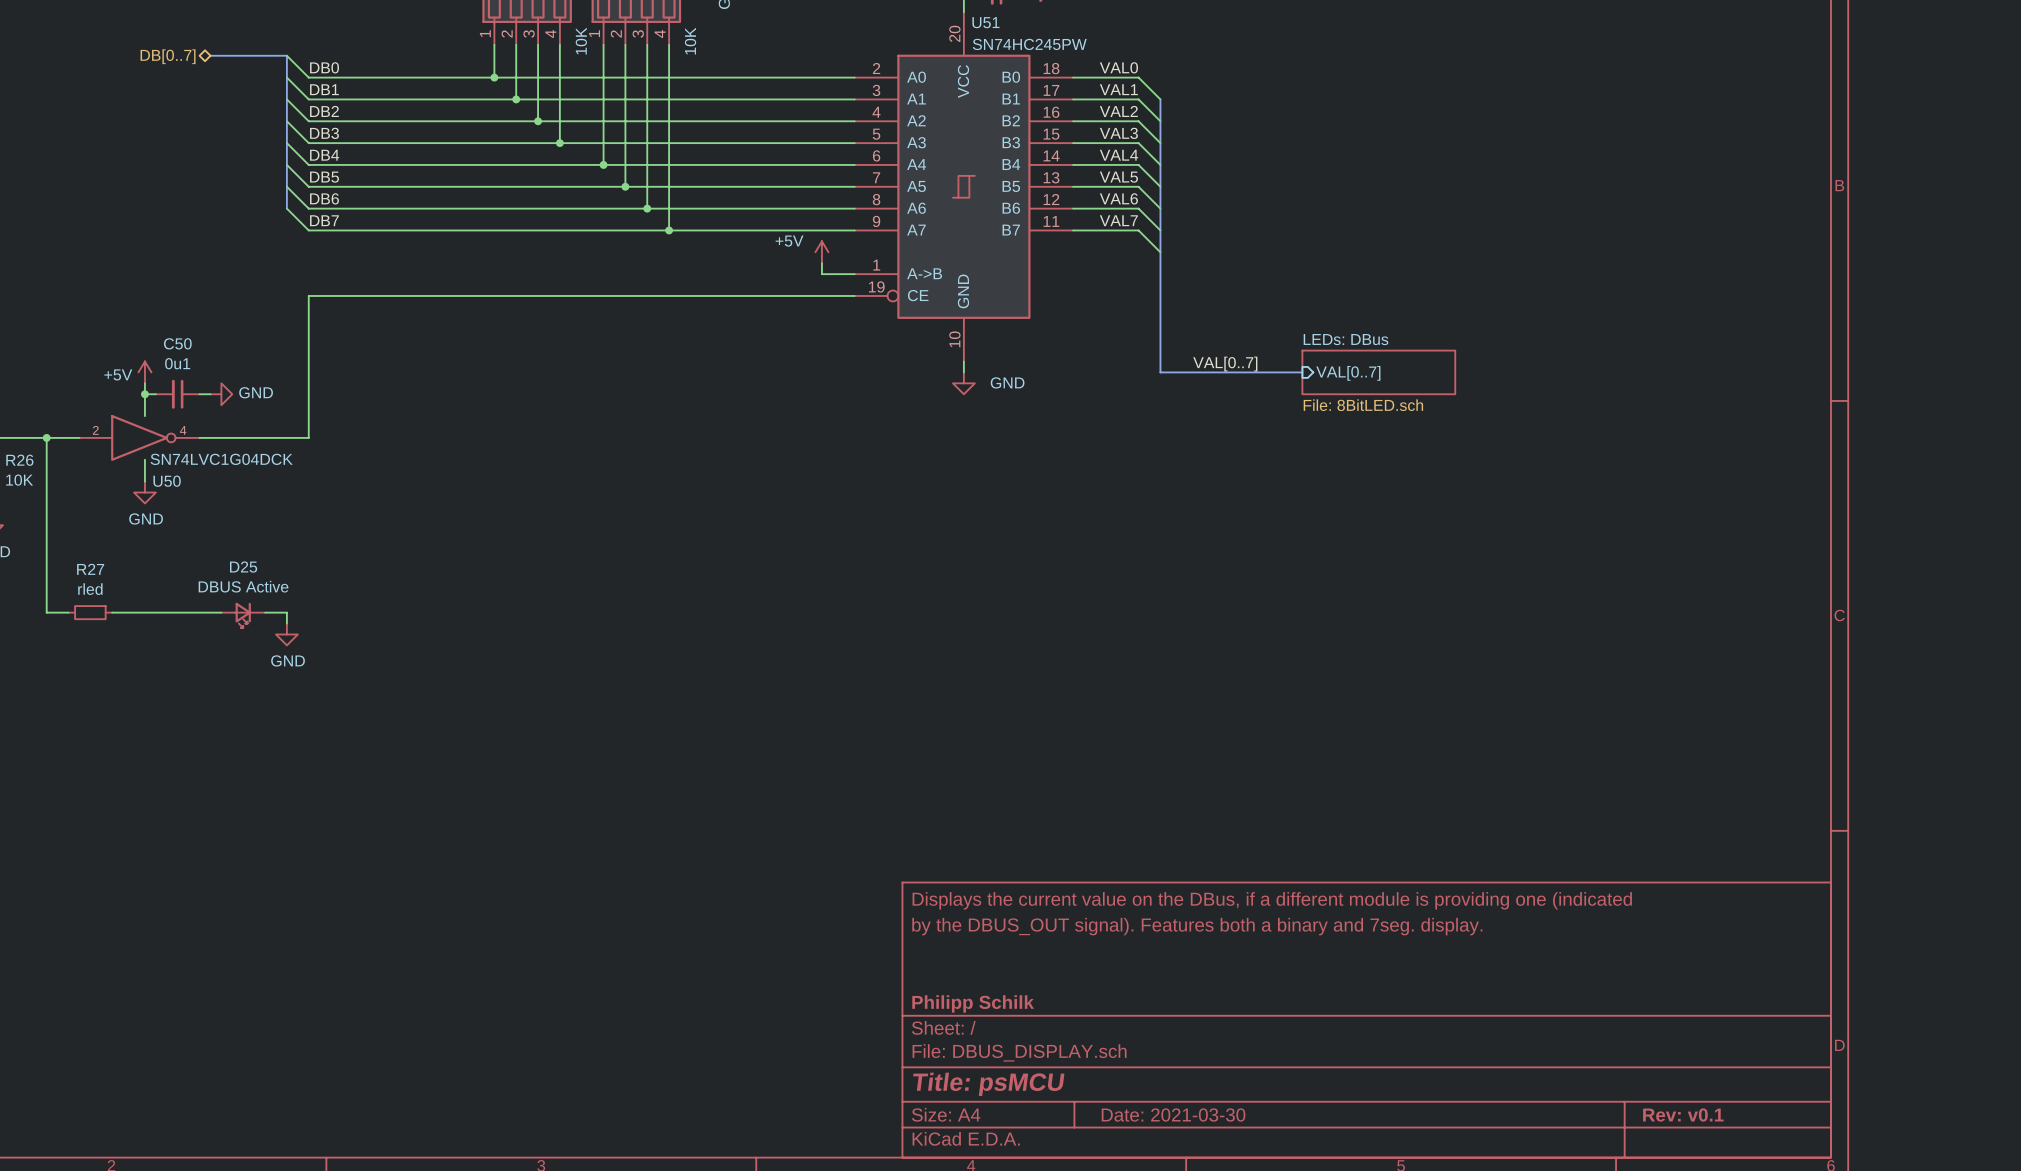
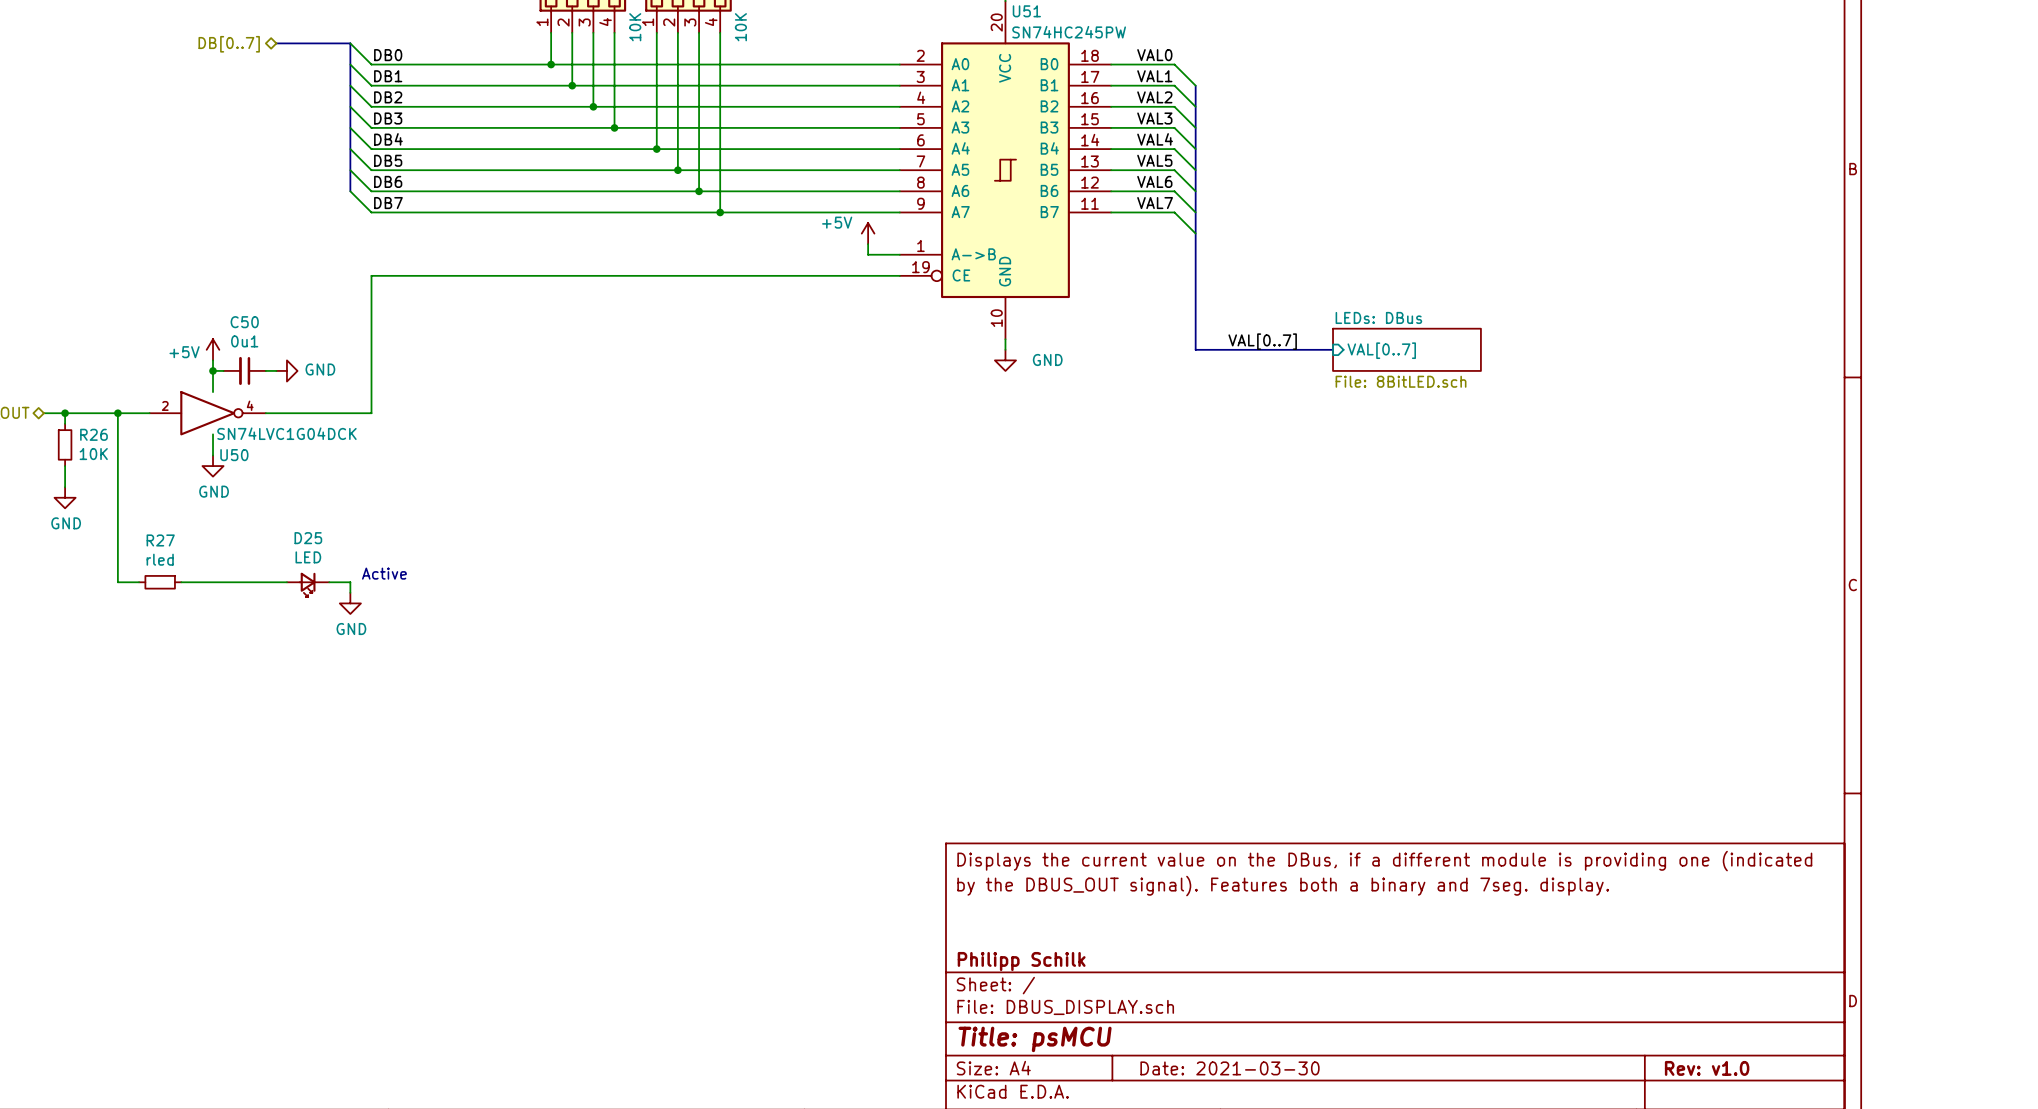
D25 value: DBUS Active (243, 586) -> LED (308, 557)
text: none -> Active (384, 573)
title block: Rev: v0.1 (1683, 1115) -> Rev: v1.0 (1707, 1068)

